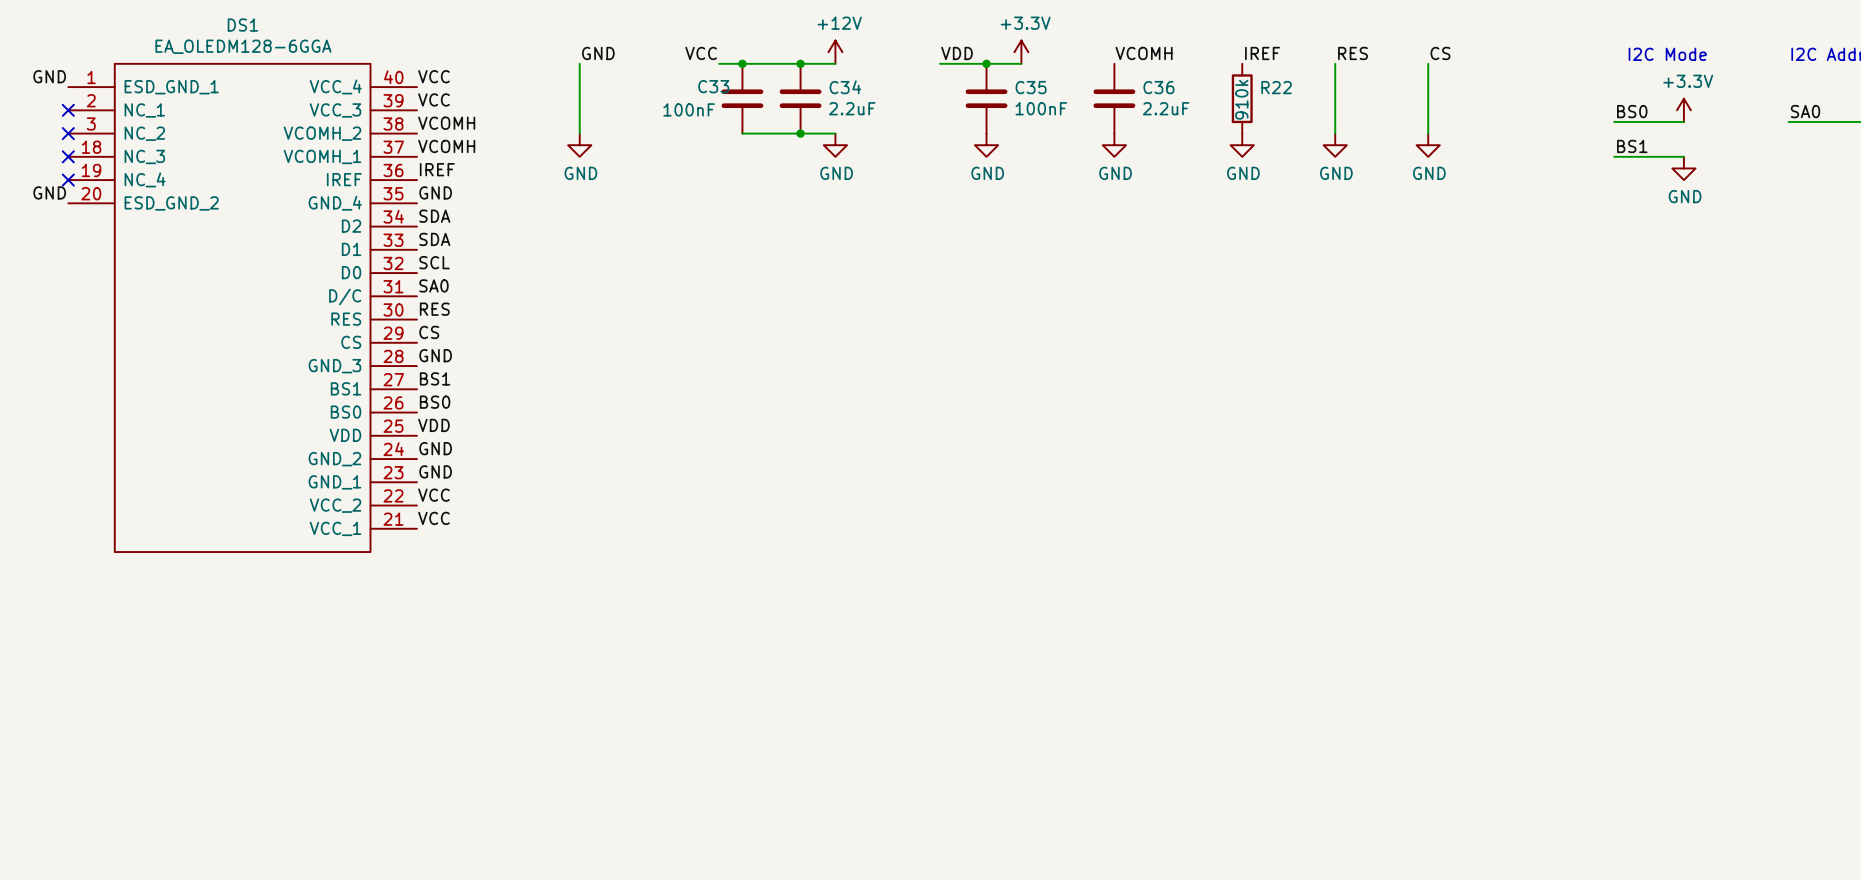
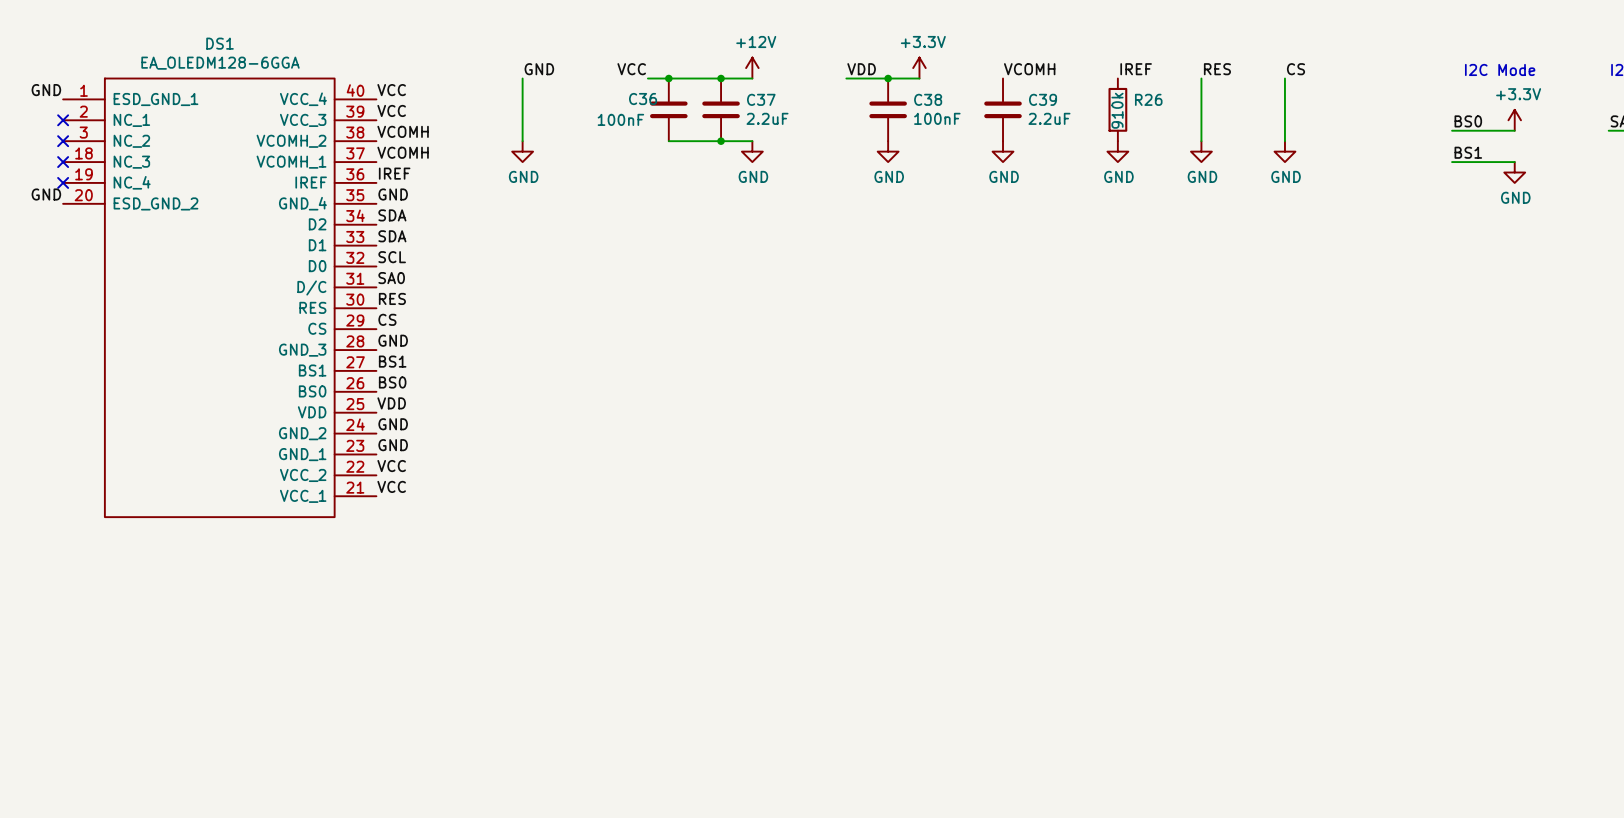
C33 name: C33 (713, 86) -> C36 (643, 99)
C34 name: C34 (845, 87) -> C37 (761, 99)
C35 name: C35 (1031, 87) -> C38 (928, 99)
C36 name: C36 (1158, 87) -> C39 (1043, 99)
R22 name: R22 (1276, 87) -> R26 (1148, 99)

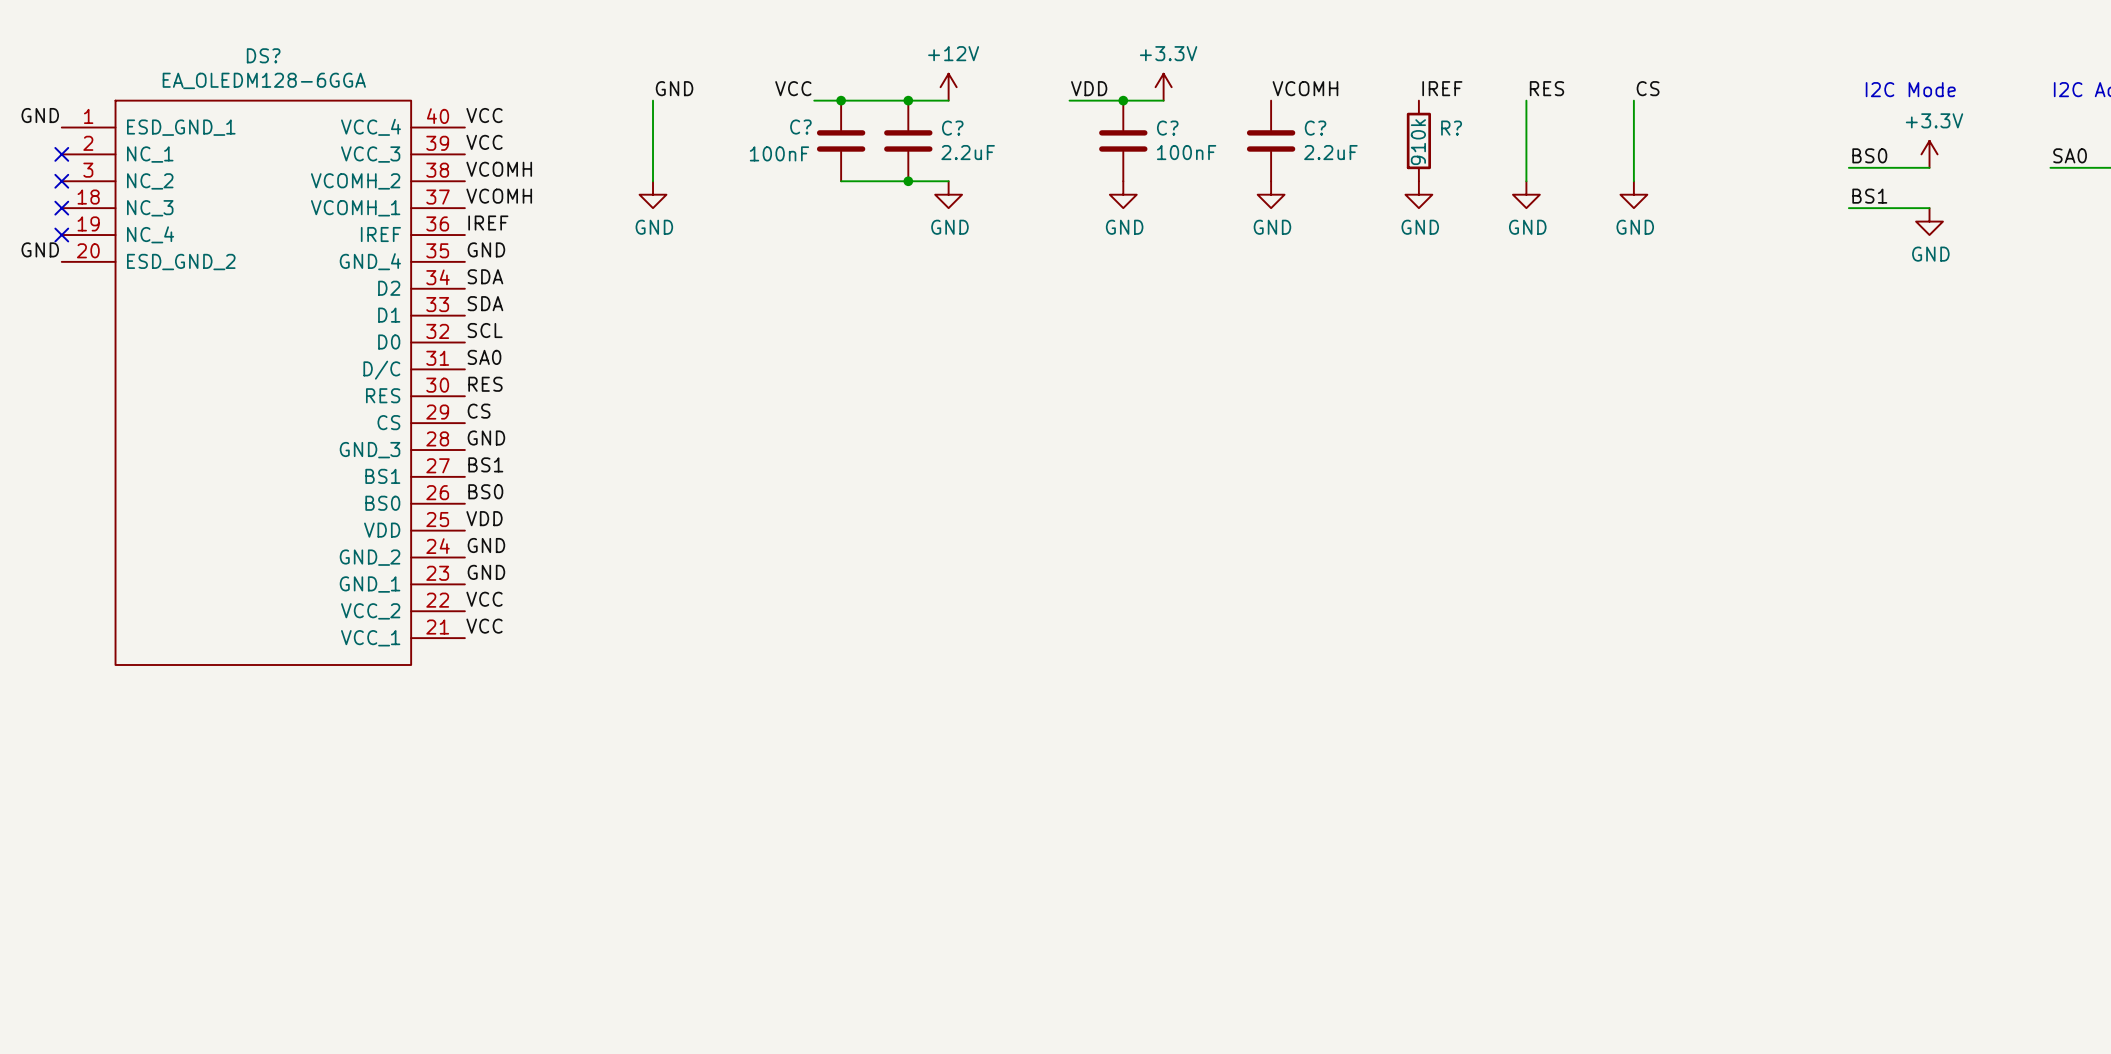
DS1 name: DS1 (220, 43) -> DS? (263, 55)
C36 name: C36 (643, 99) -> C? (800, 127)
C37 name: C37 (761, 99) -> C? (952, 128)
C38 name: C38 (928, 99) -> C? (1167, 128)
C39 name: C39 (1043, 99) -> C? (1315, 128)
R26 name: R26 (1148, 99) -> R? (1451, 128)

